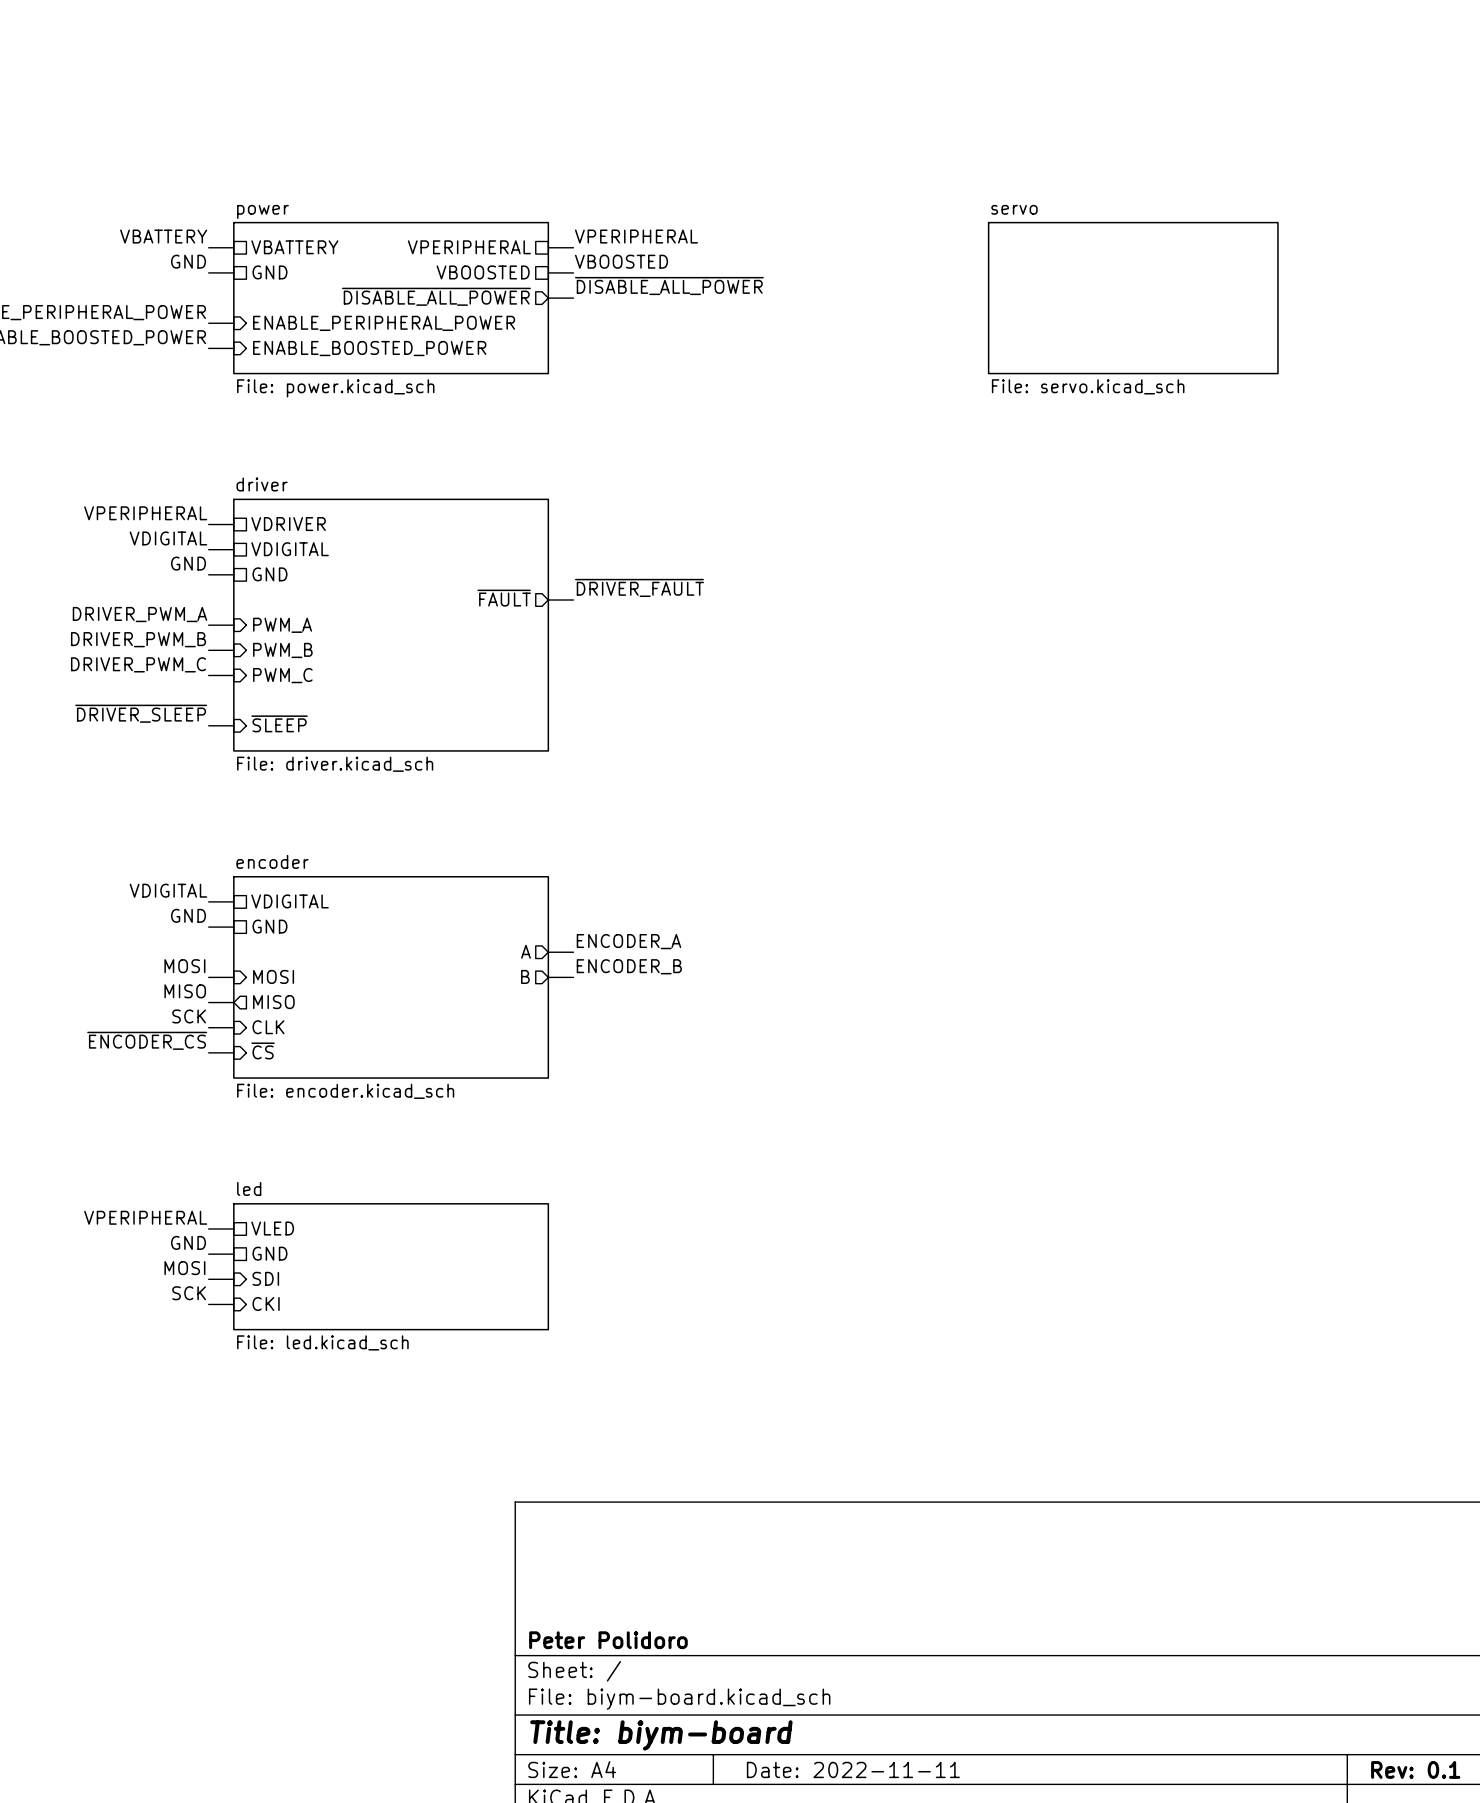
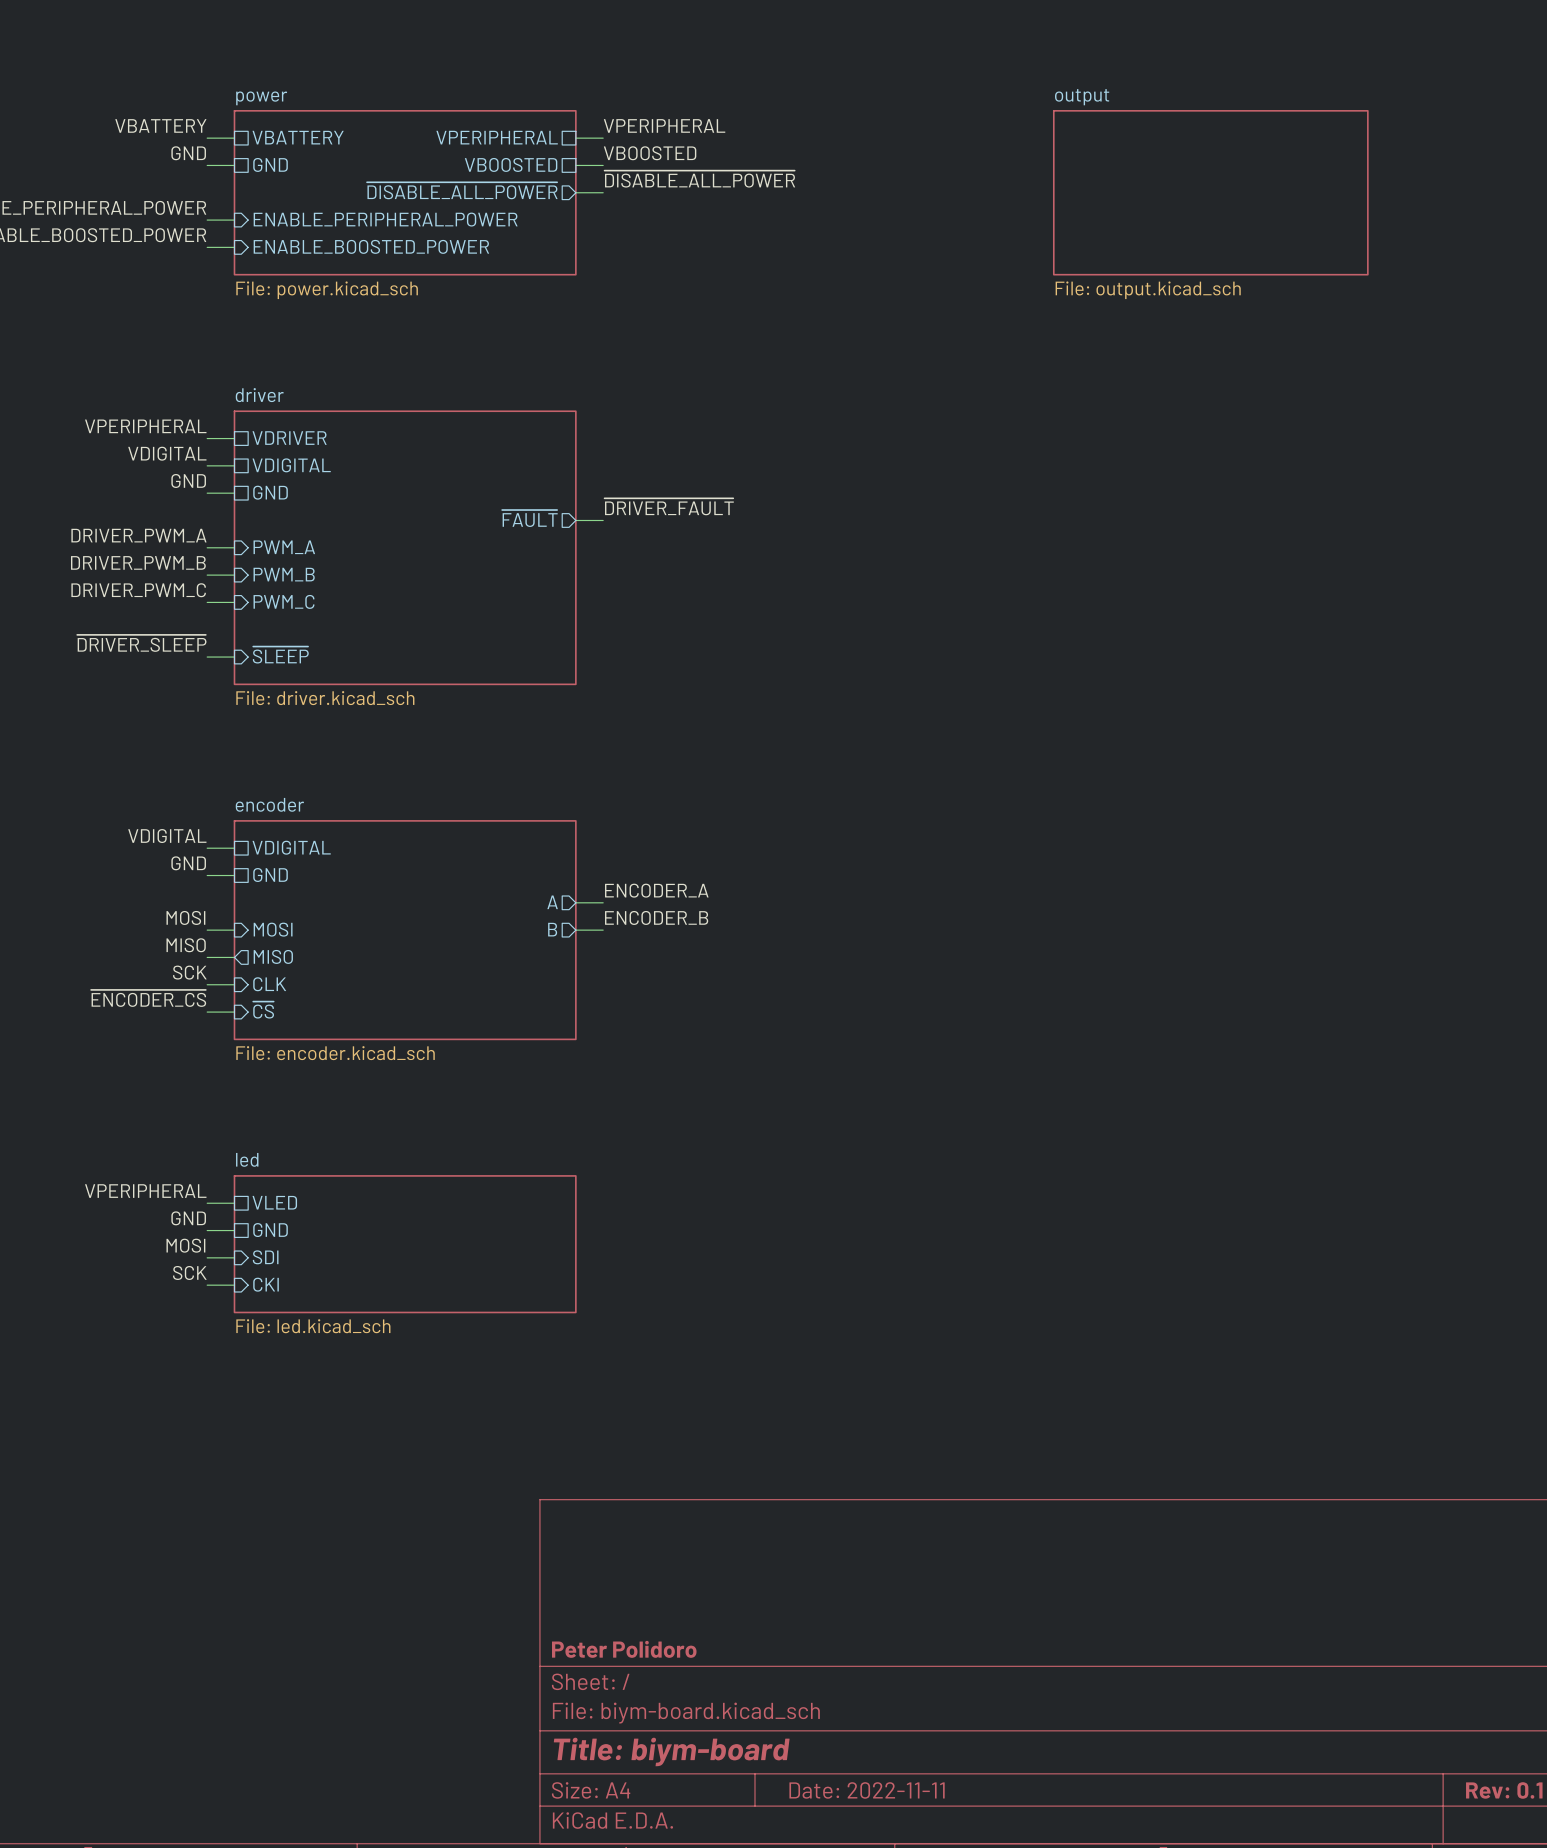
sheet servo name: servo (1014, 209) -> output (1082, 97)
sheet servo value: File: servo.kicad_sch (1088, 386) -> File: output.kicad_sch (1148, 290)

